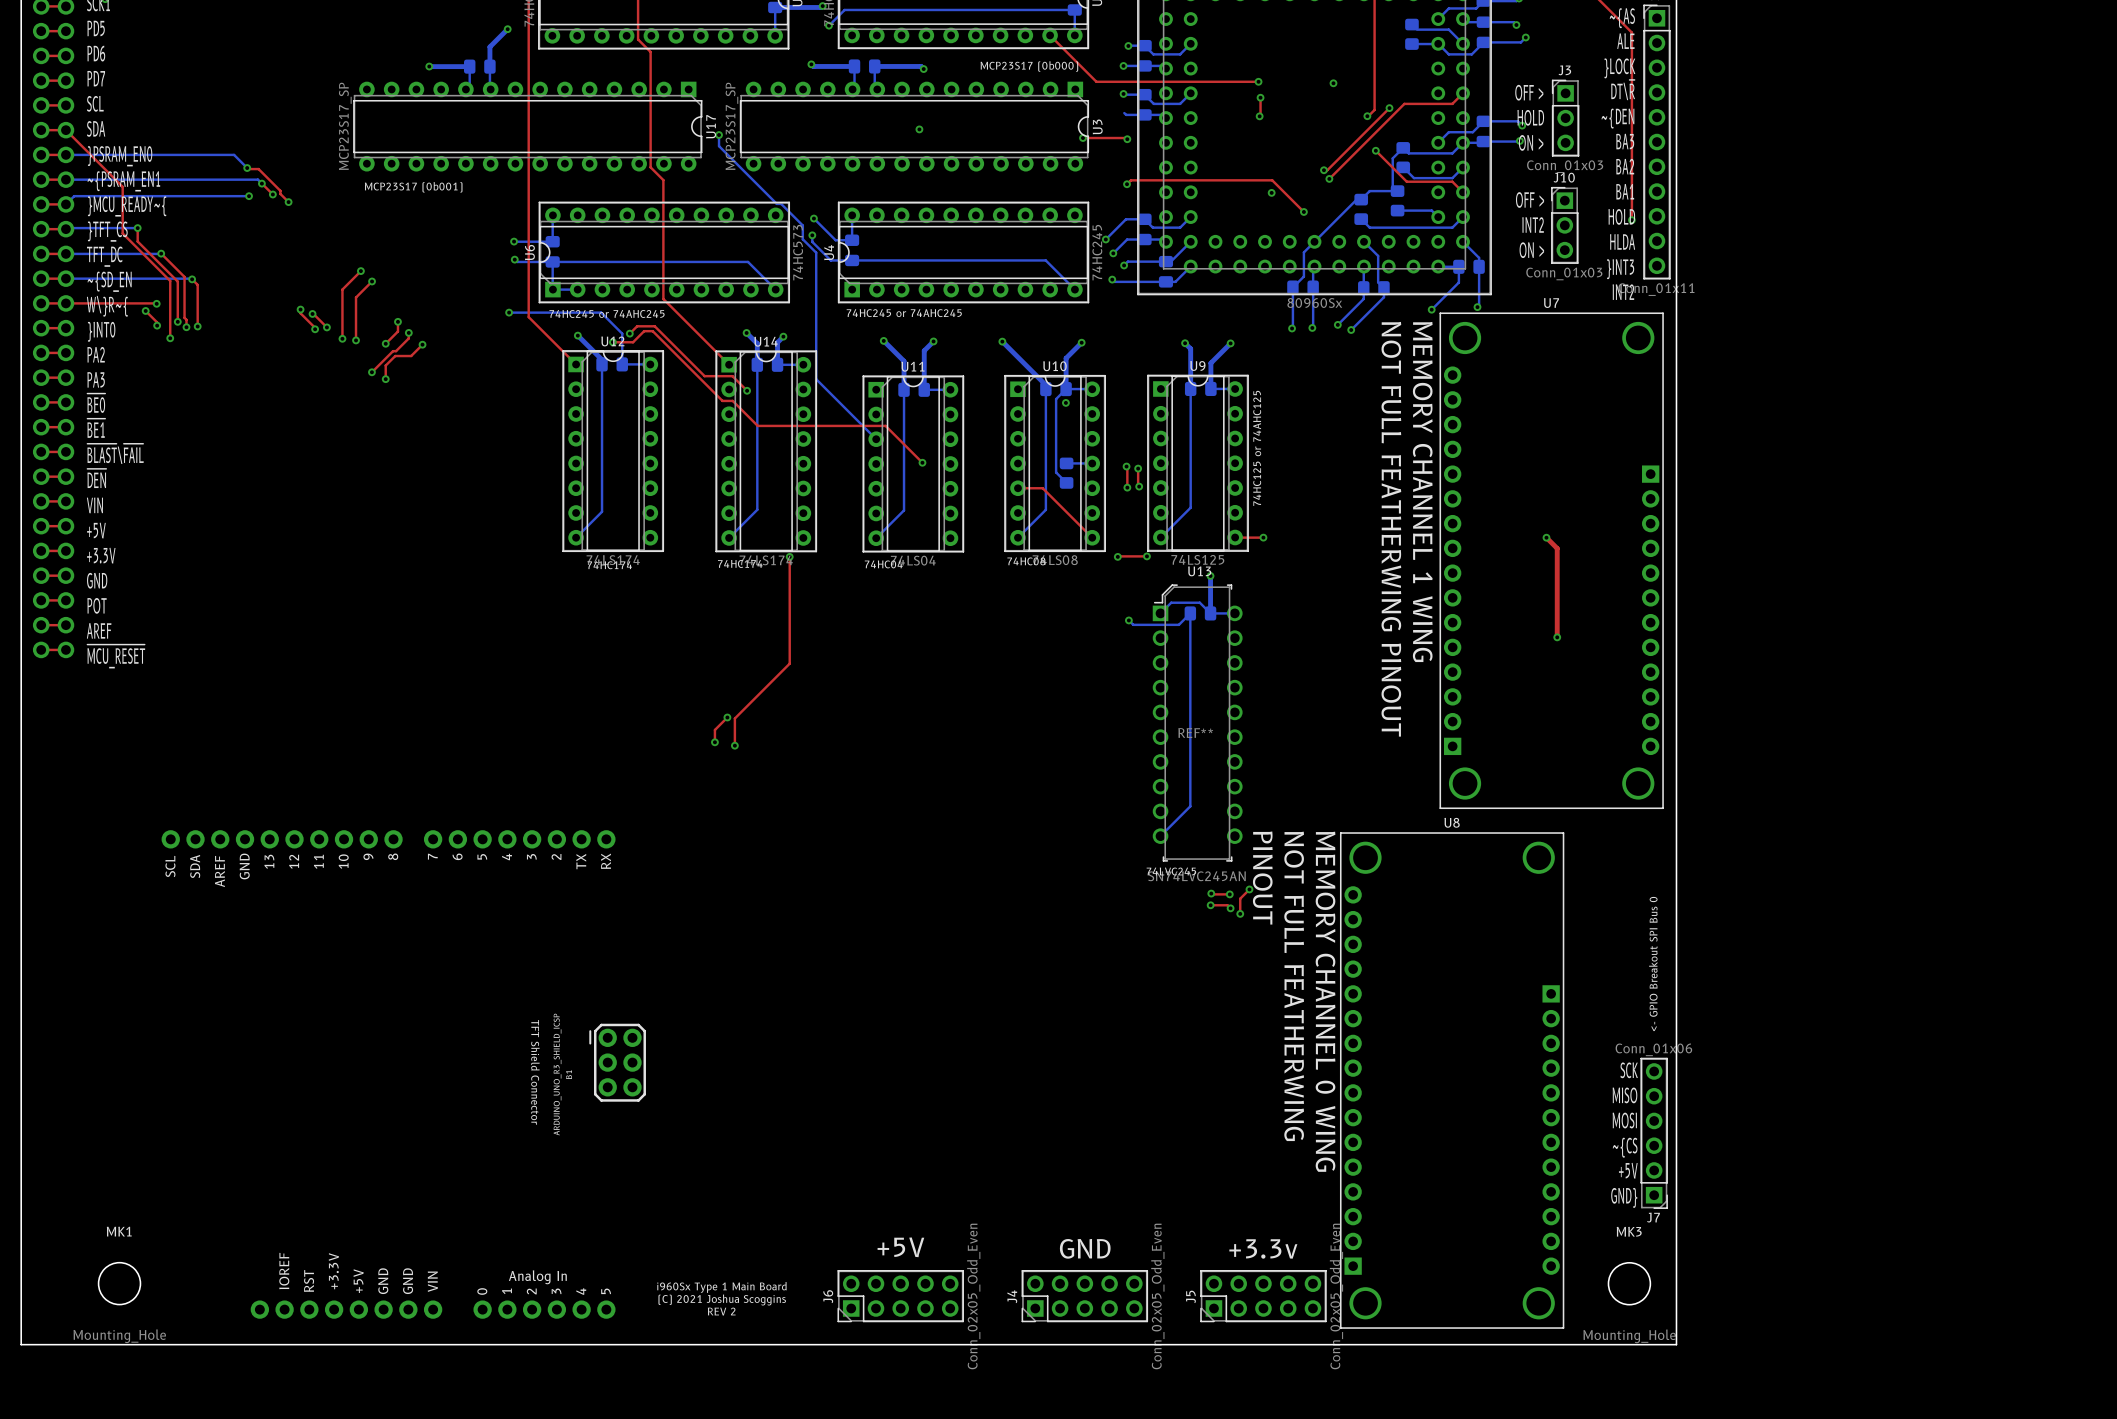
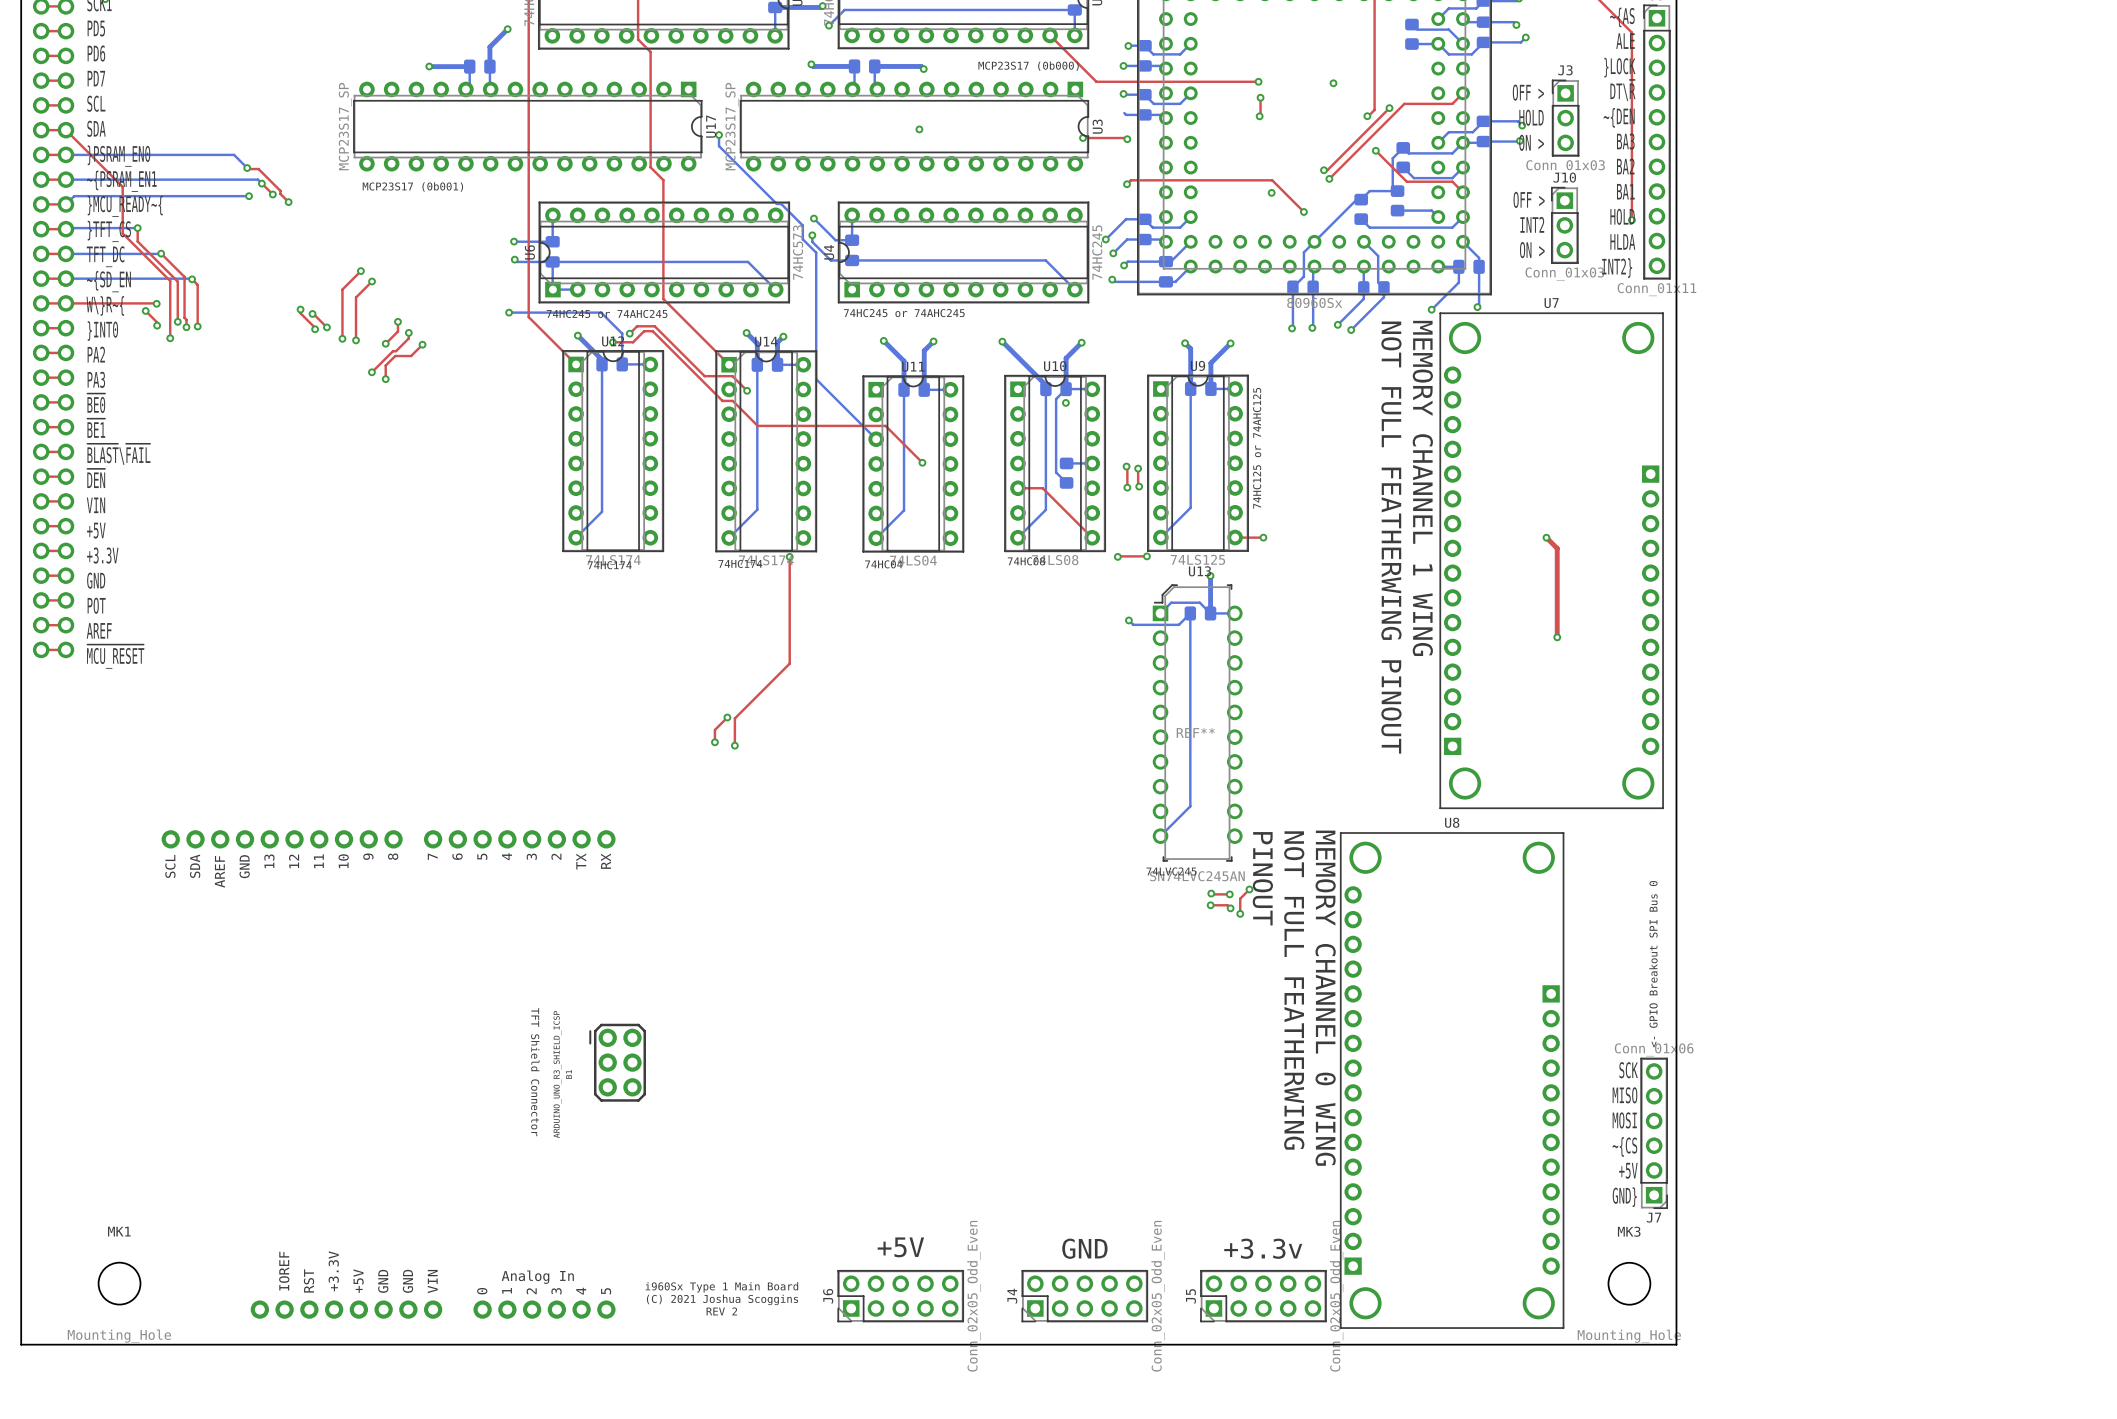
text: }INT3 (1620, 269) -> INT2} (1617, 268)
text: INT2 (1623, 292) -> none

